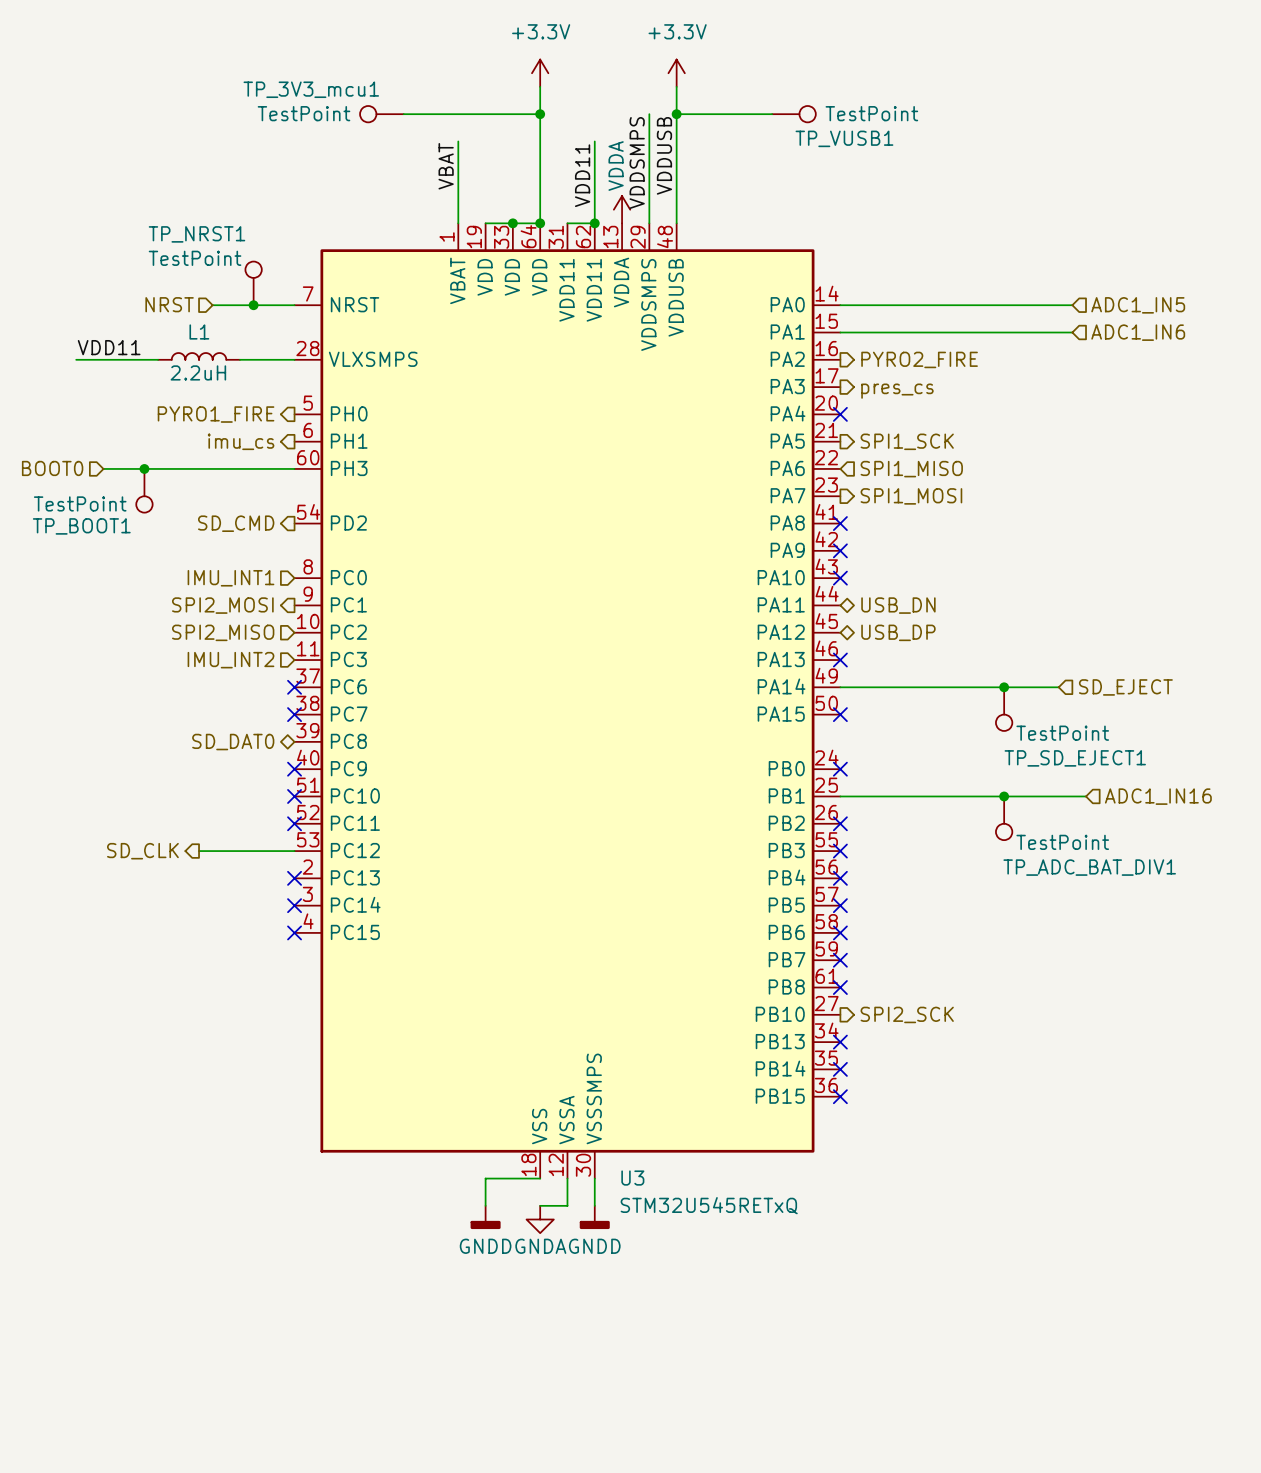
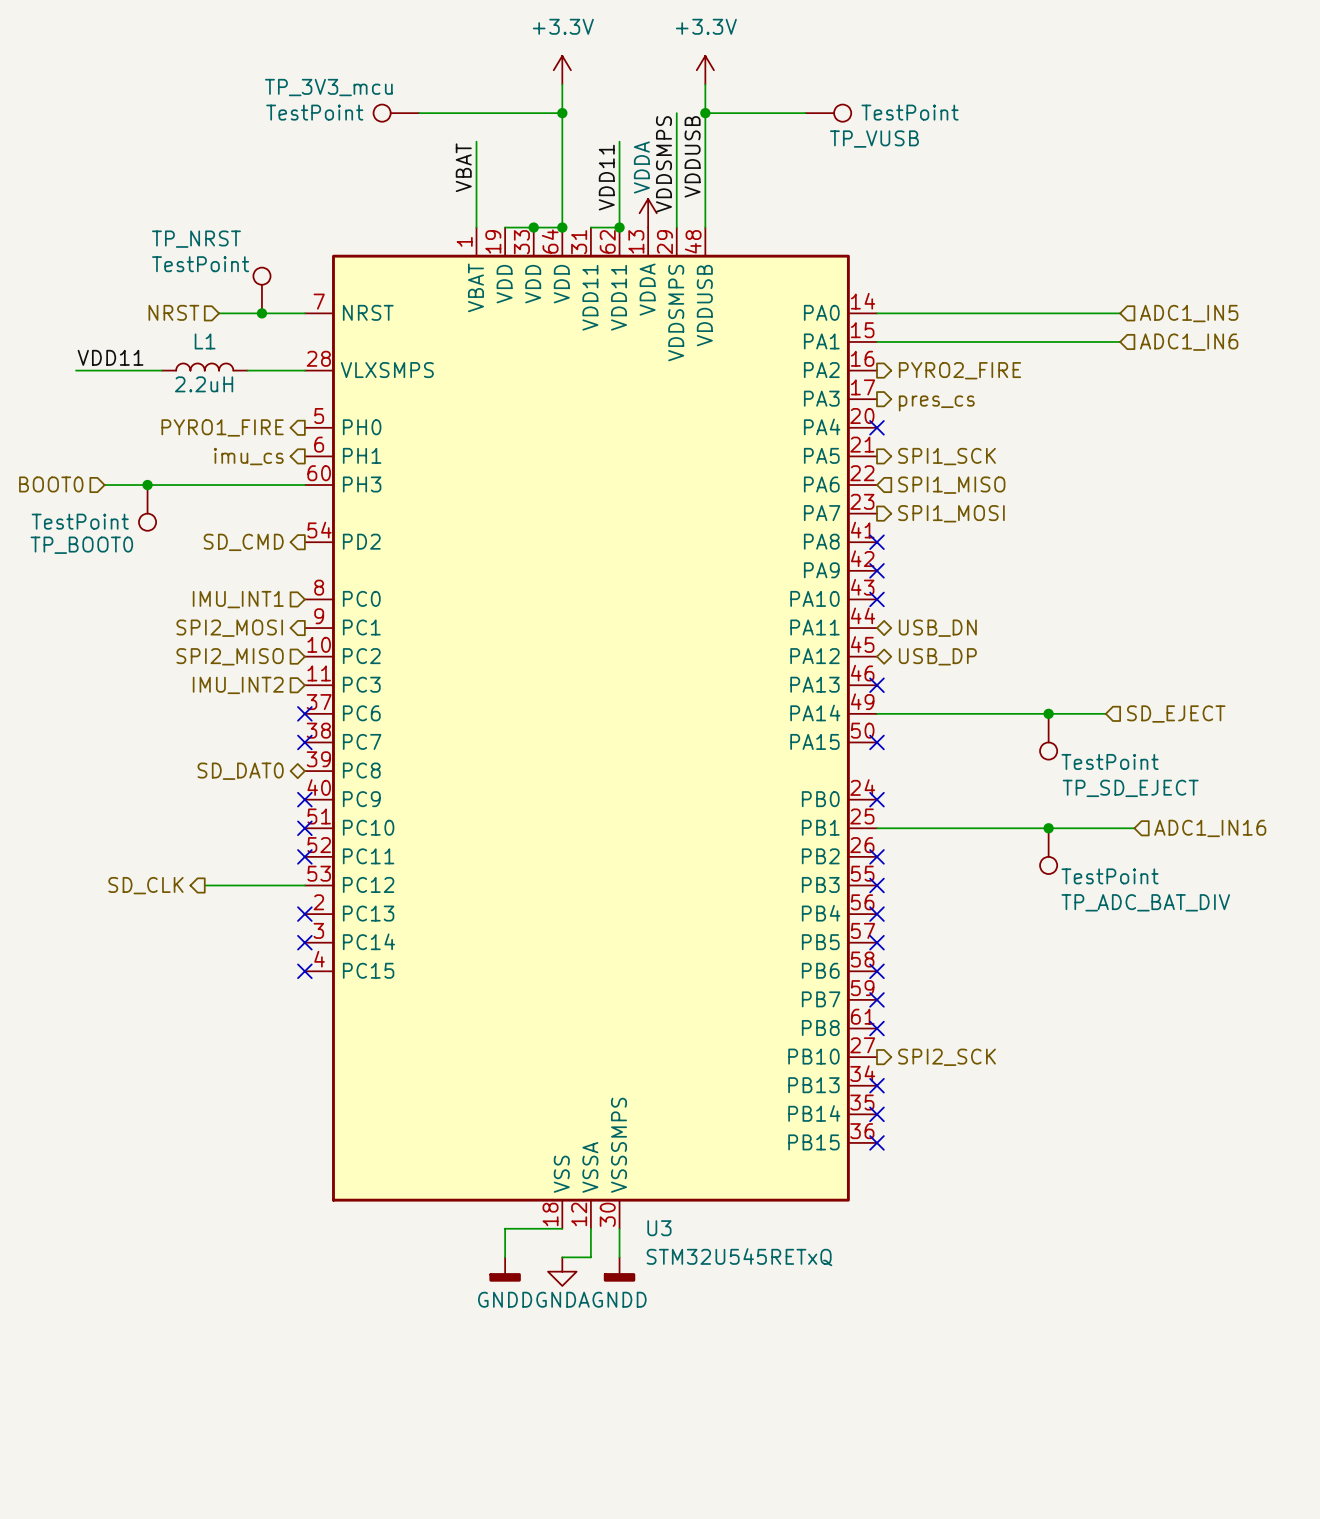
TP_3V3_mcu1 name: TP_3V3_mcu1 (311, 89) -> TP_3V3_mcu (328, 87)
TP_VUSB1 name: TP_VUSB1 (844, 138) -> TP_VUSB (874, 139)
TP_NRST1 name: TP_NRST1 (196, 234) -> TP_NRST (196, 239)
TP_BOOT1 name: TP_BOOT1 (81, 526) -> TP_BOOT0 (81, 545)
TP_SD_EJECT1 name: TP_SD_EJECT1 (1075, 758) -> TP_SD_EJECT (1130, 788)
TP_ADC_BAT_DIV1 name: TP_ADC_BAT_DIV1 (1089, 867) -> TP_ADC_BAT_DIV (1145, 902)

